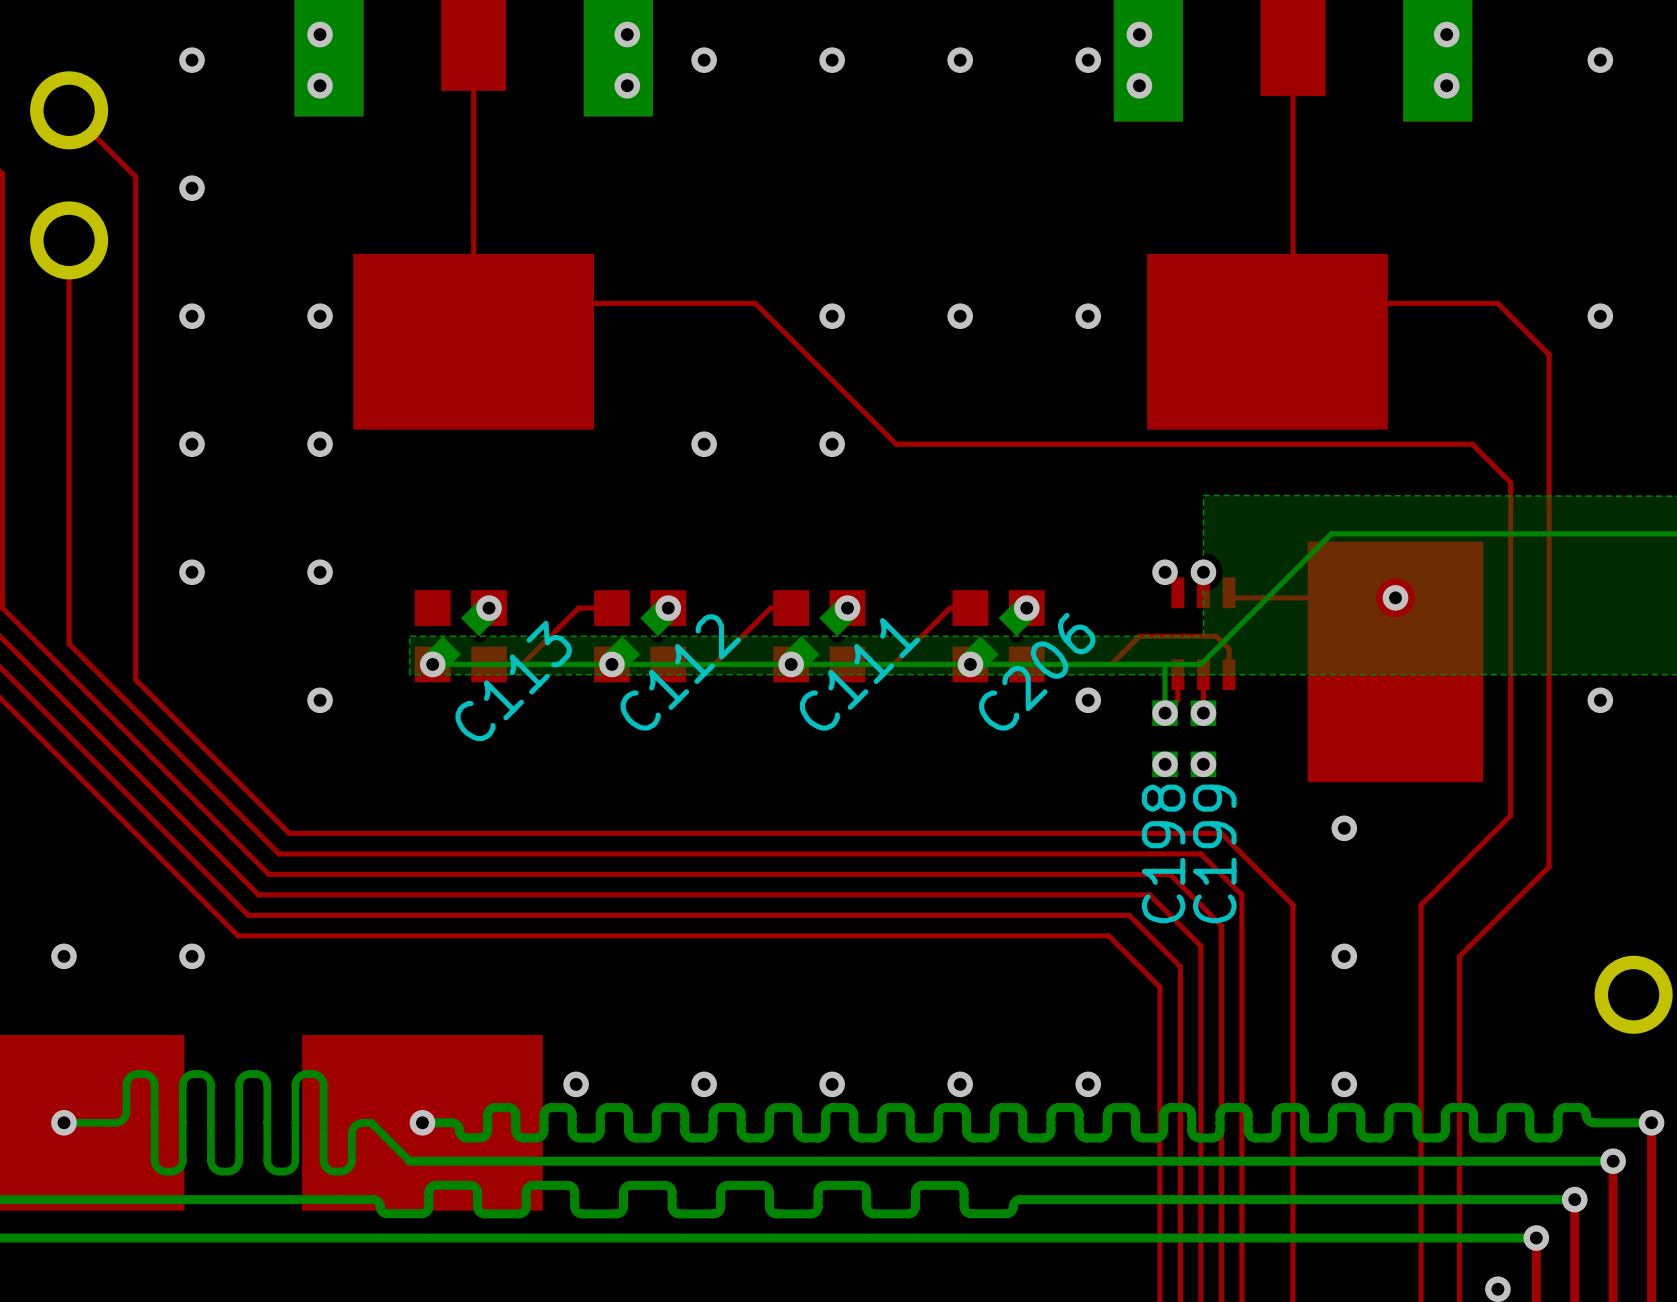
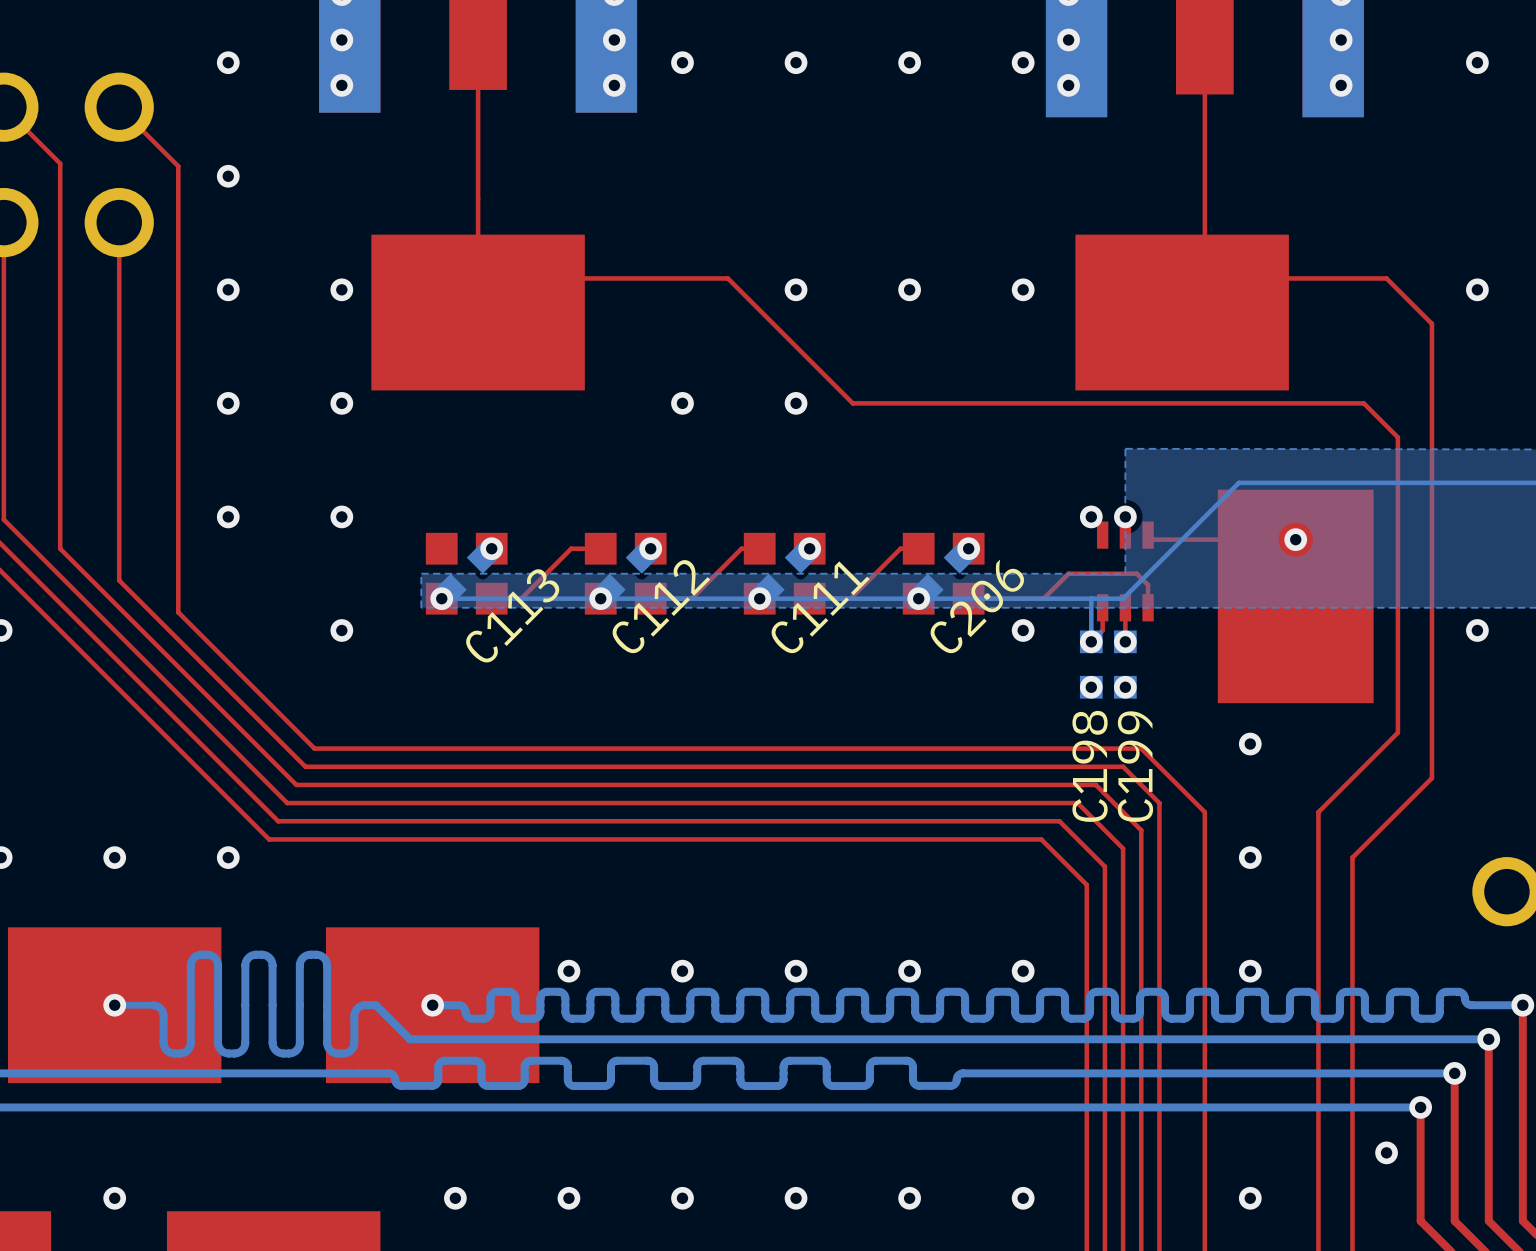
bottom track: (106, 1122) (118, 1122) (124, 1117) (126, 1083) (129, 1077) (137, 1074) (150, 1076) (154, 1085) (155, 1163) (161, 1170) (175, 1170) (180, 1167) (182, 1161) (183, 1082) (189, 1074) (203, 1074) (208, 1078) (210, 1083) (211, 1163) (217, 1170) (230, 1171) (236, 1167) (239, 1161) (239, 1082) (246, 1074) (258, 1074) (264, 1078) (267, 1083) (267, 1163) (274, 1170) (287, 1171) (292, 1168) (295, 1161) (295, 1082) (302, 1074) (313, 1074) (320, 1077) (323, 1083) (323, 1160) (326, 1168) (331, 1171) (340, 1171) (349, 1167) (351, 1161) (352, 1131) (356, 1125) (361, 1122) (371, 1122) (409, 1161) -> (152, 1005) (158, 1006) (162, 1012) (163, 1043) (165, 1049) (173, 1053) (186, 1051) (190, 1042) (191, 963) (198, 955) (211, 955) (218, 964) (218, 1045) (225, 1052) (239, 1052) (245, 1043) (245, 963) (252, 955) (265, 955) (270, 958) (272, 964) (272, 1045) (279, 1052) (292, 1052) (297, 1049) (299, 1043) (300, 963) (306, 955) (317, 954) (323, 957) (327, 964) (327, 1042) (331, 1051) (344, 1053) (351, 1049) (354, 1043) (354, 1013) (358, 1007) (364, 1005) (375, 1005) (409, 1039) (421, 1039)

